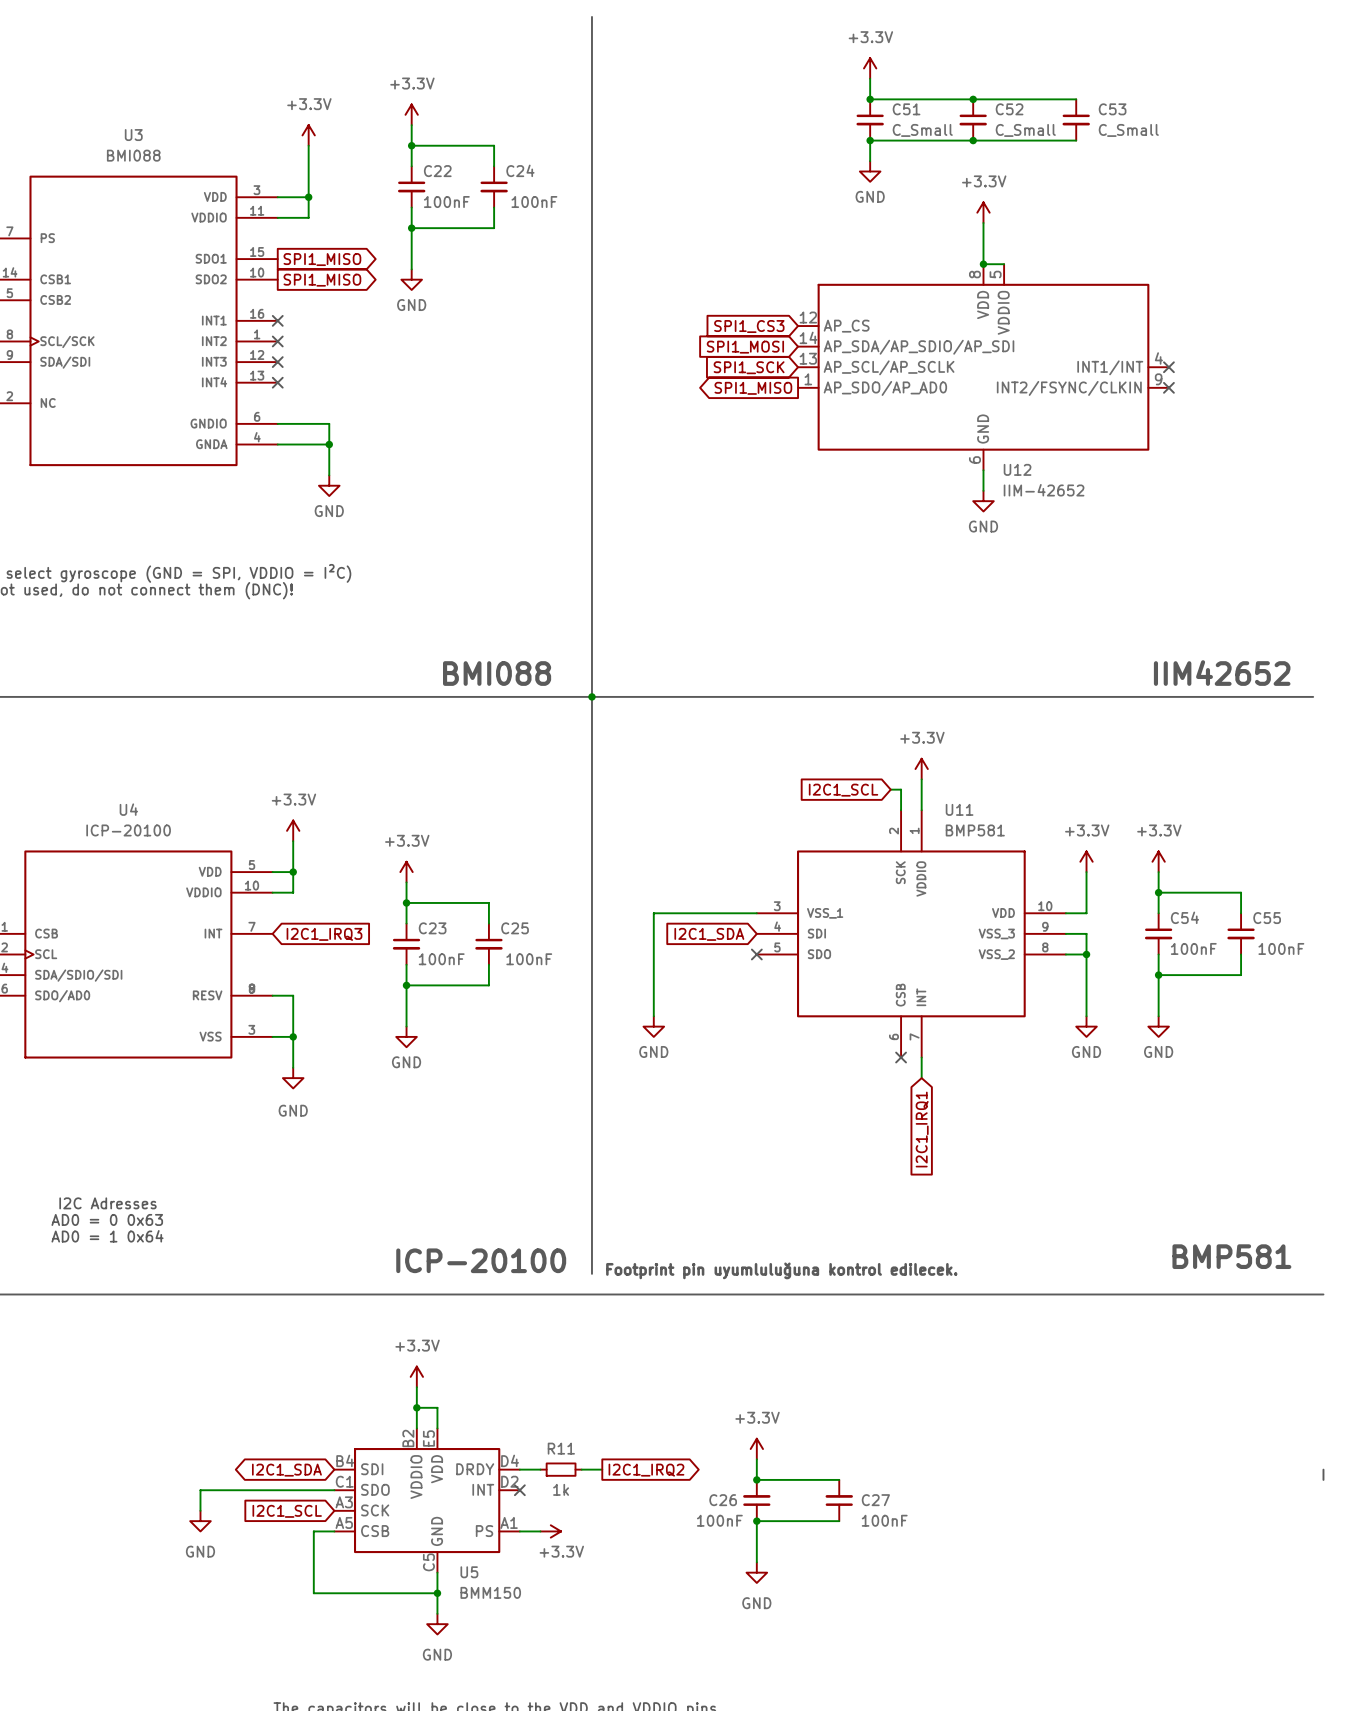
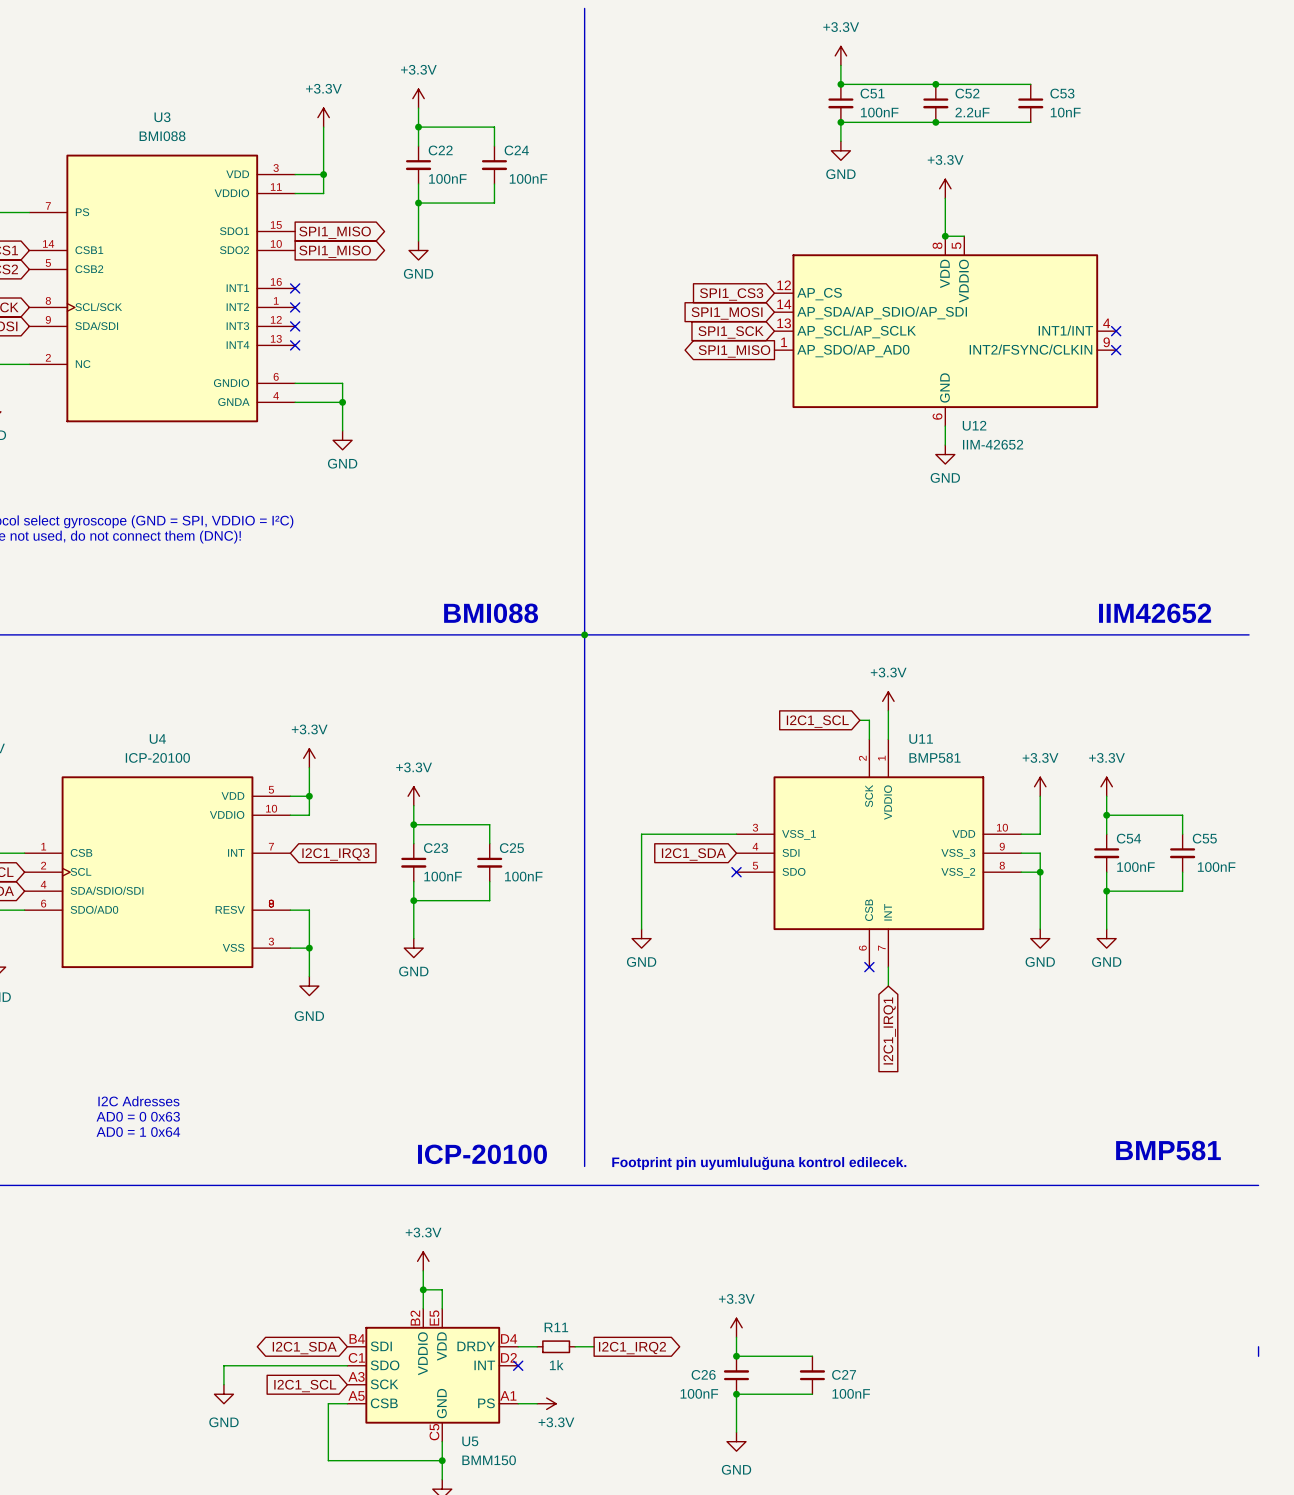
C51 value: C_Small (922, 130) -> 100nF (879, 112)
C52 value: C_Small (1025, 130) -> 2.2uF (972, 112)
C53 value: C_Small (1128, 130) -> 10nF (1065, 112)

